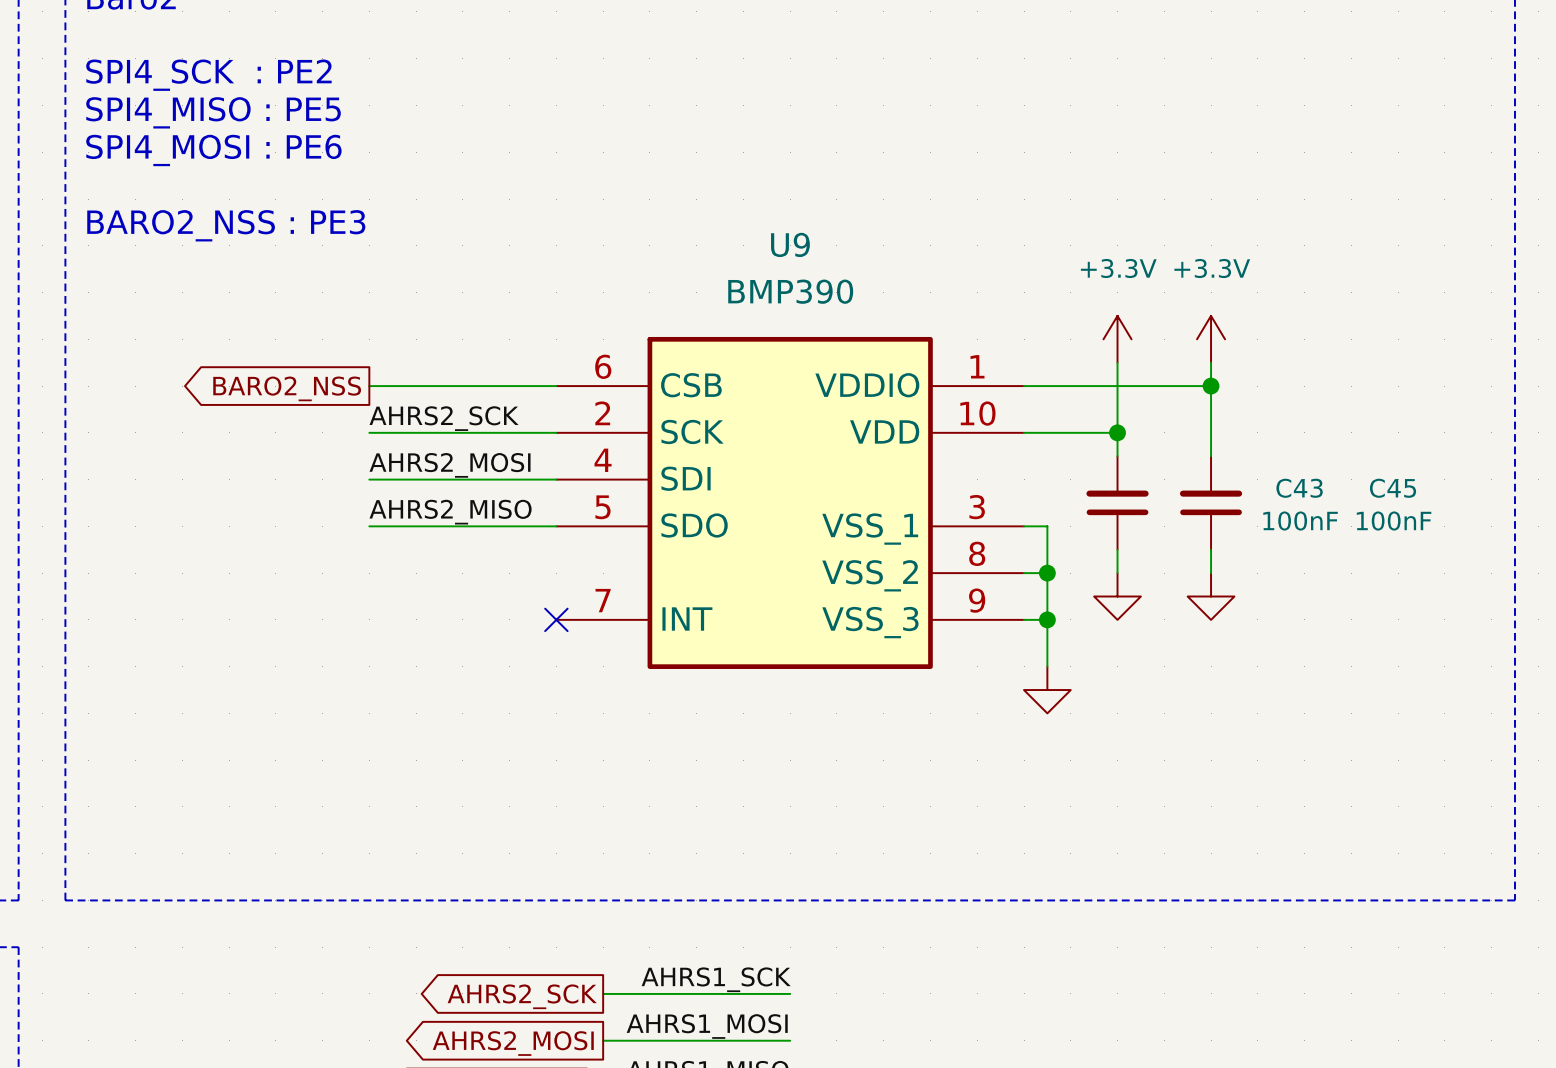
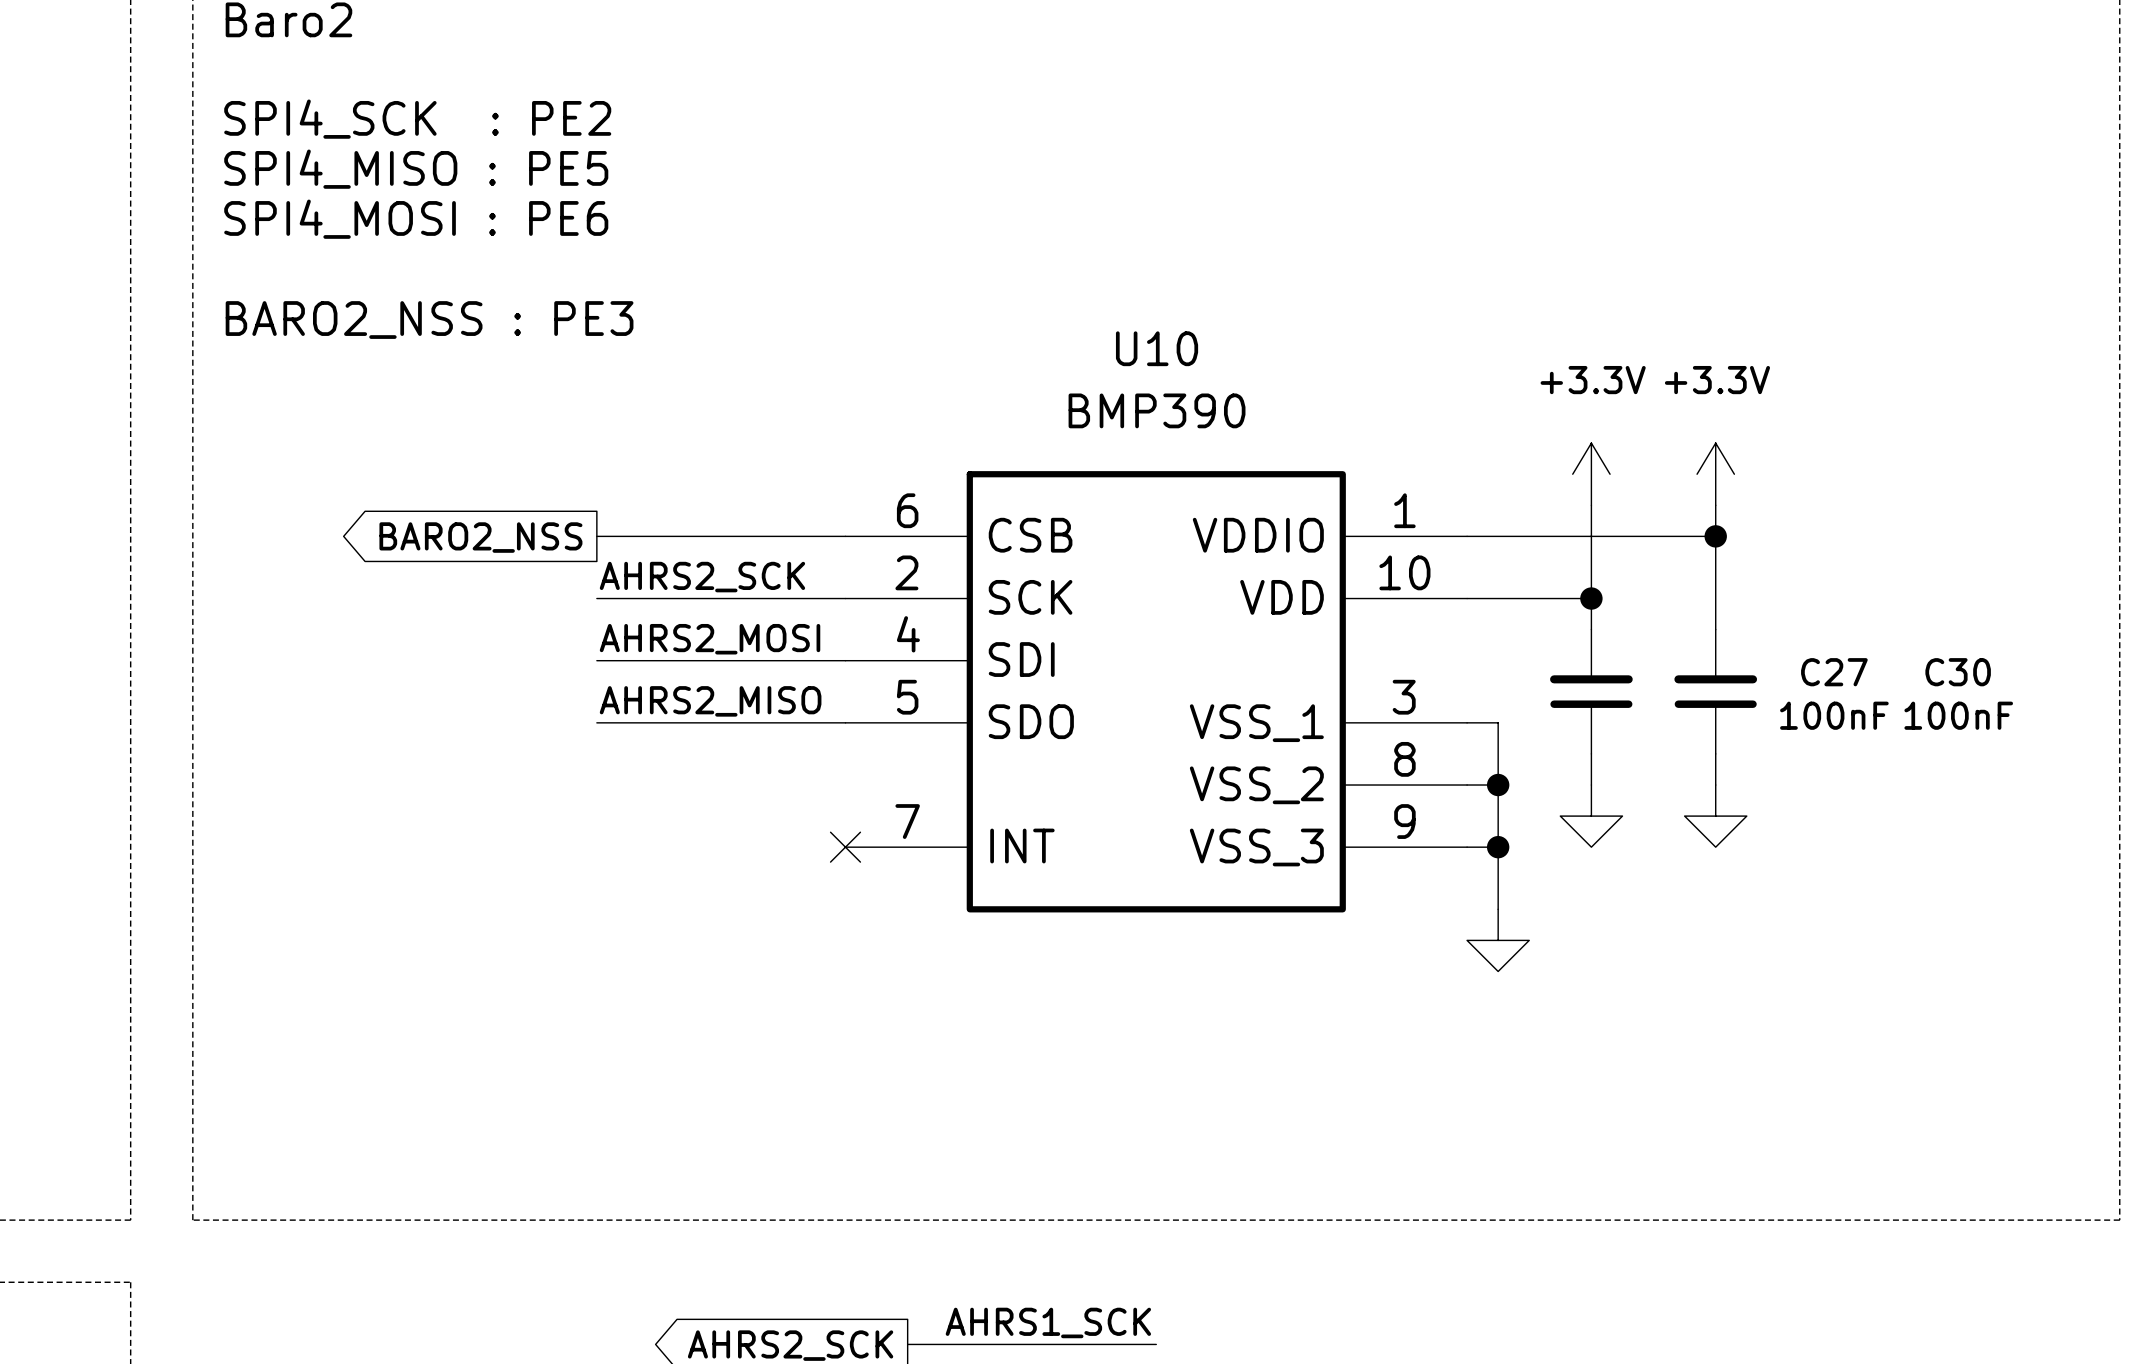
U9 name: U9 (790, 244) -> U10 (1157, 348)
C43 name: C43 (1299, 488) -> C27 (1834, 672)
C45 name: C45 (1393, 488) -> C30 (1958, 672)

